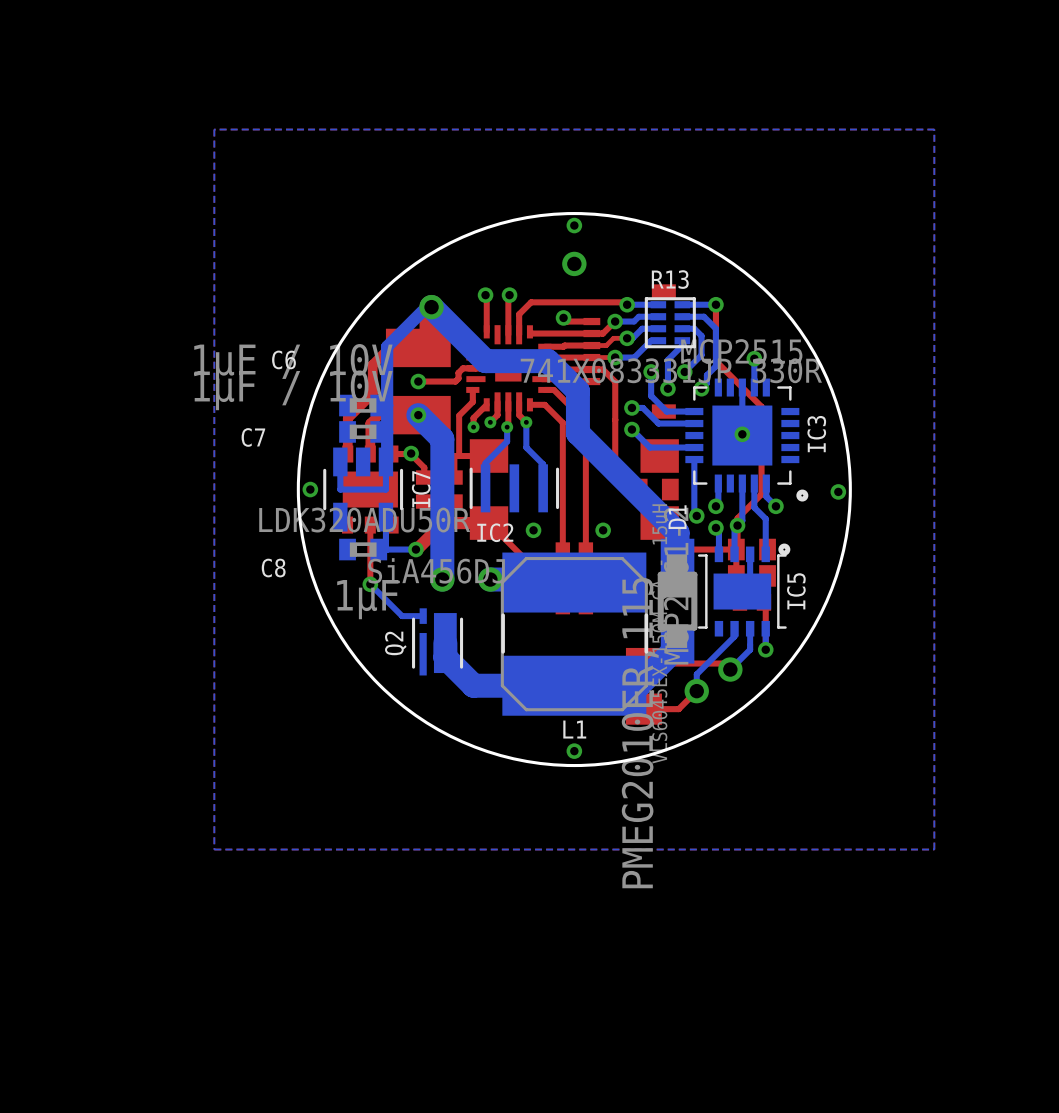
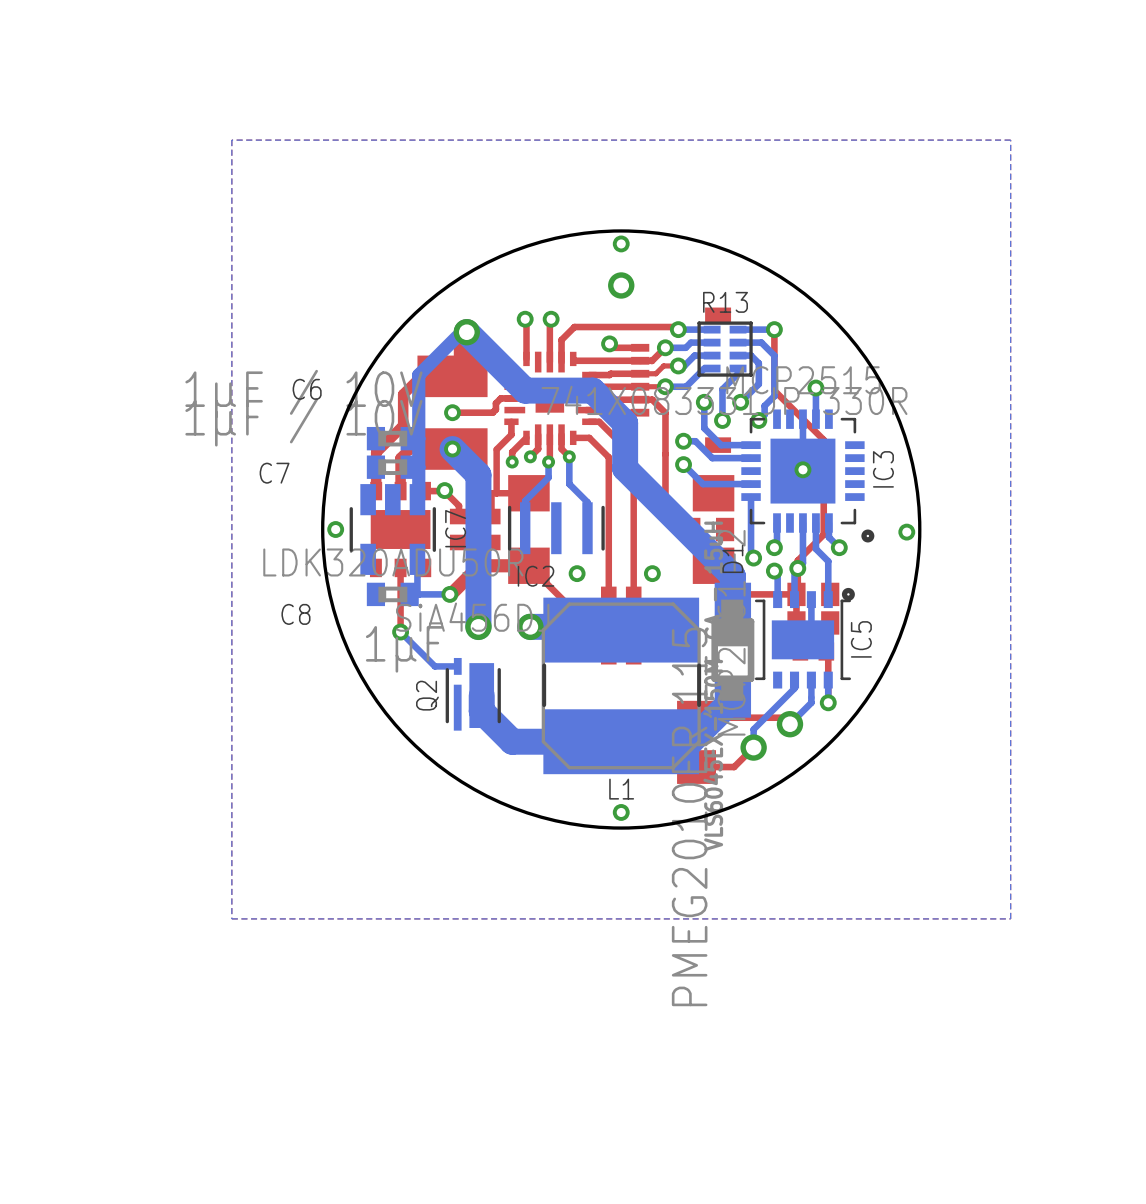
bottom track: (385, 461) (385, 489) (340, 489) (340, 461) -> none

